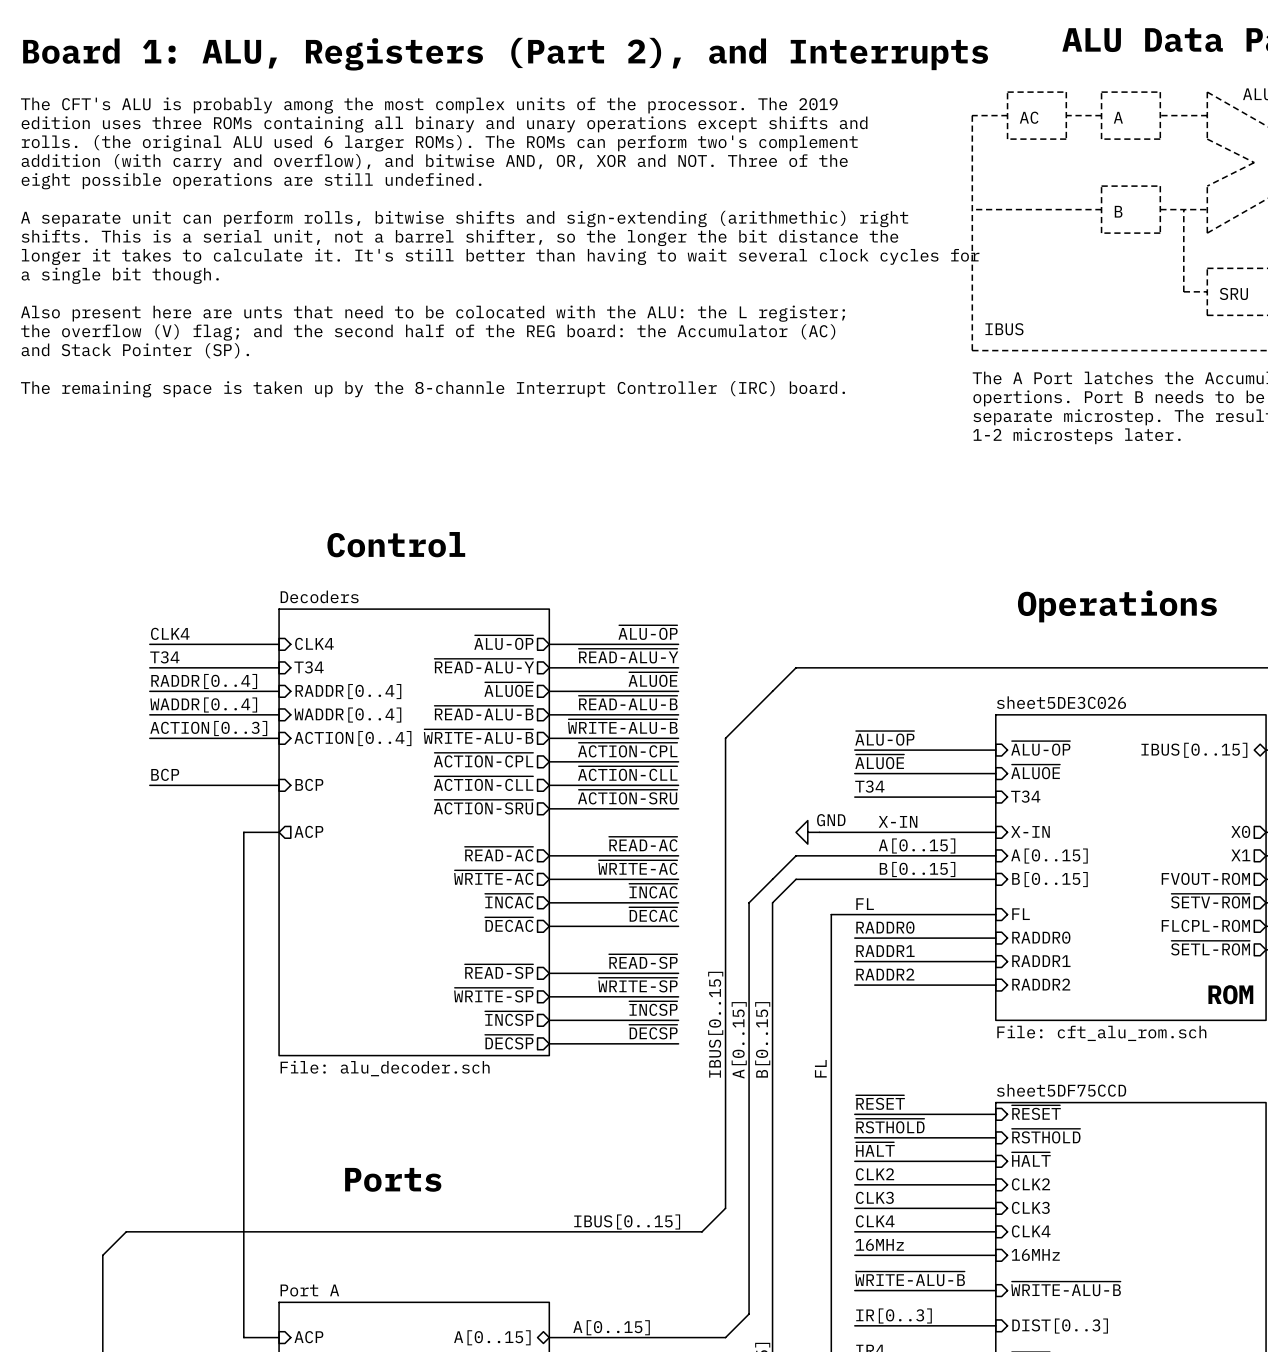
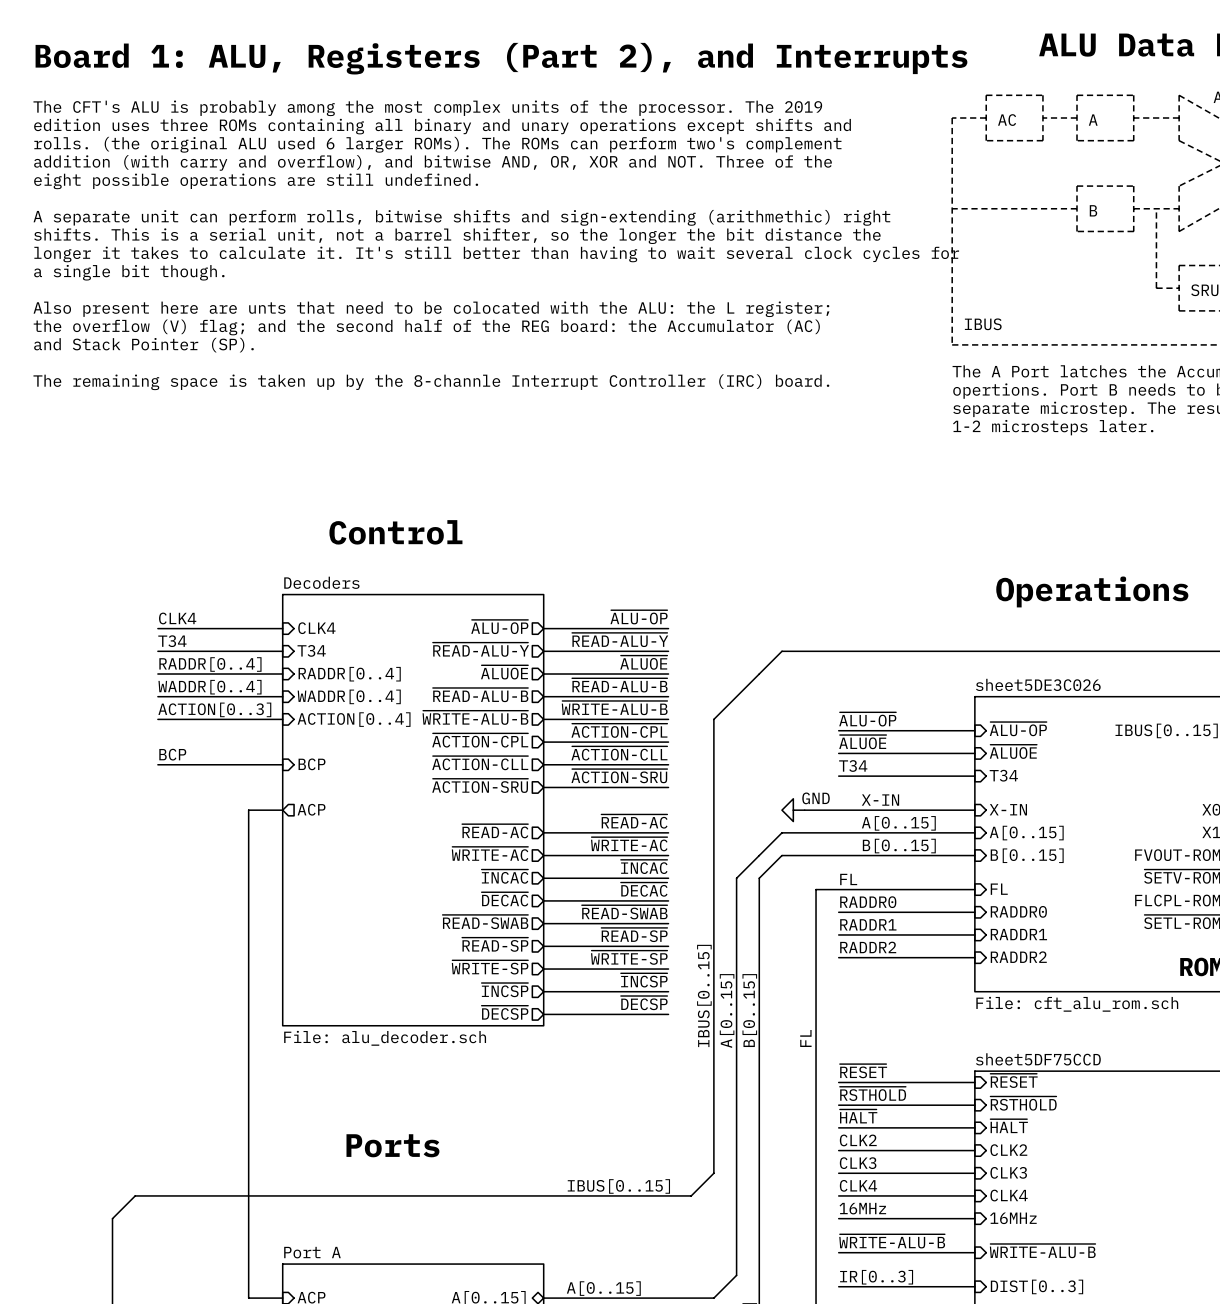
label: none -> ~{READ-SWAB} (624, 912)
sheet pin: none -> ~{READ-SWAB} (485, 922)
wire: none -> (543, 923) (668, 923)

